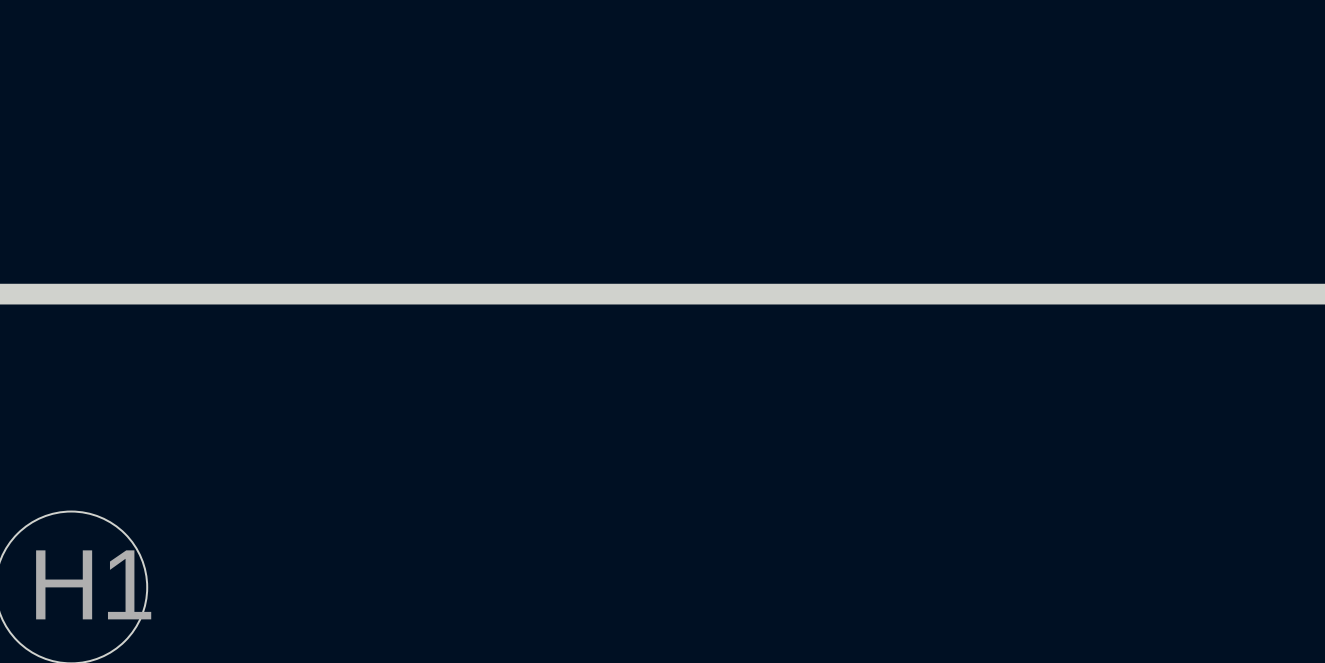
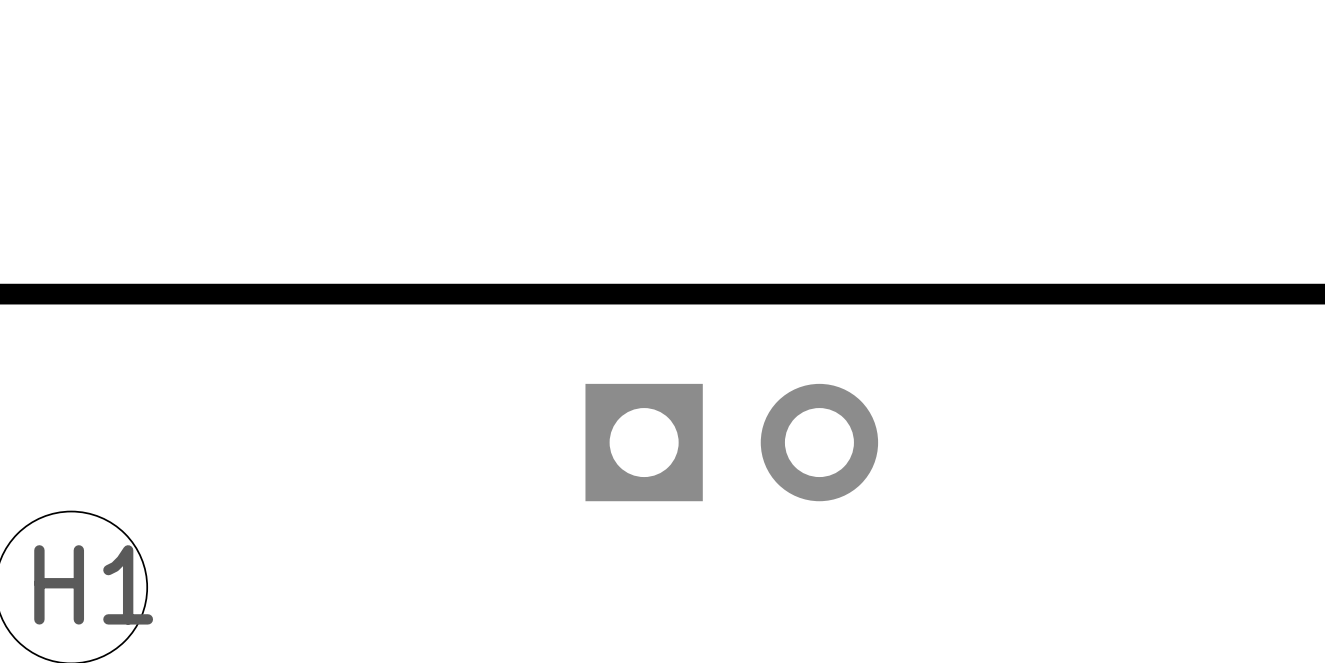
part: none -> (731, 442)

